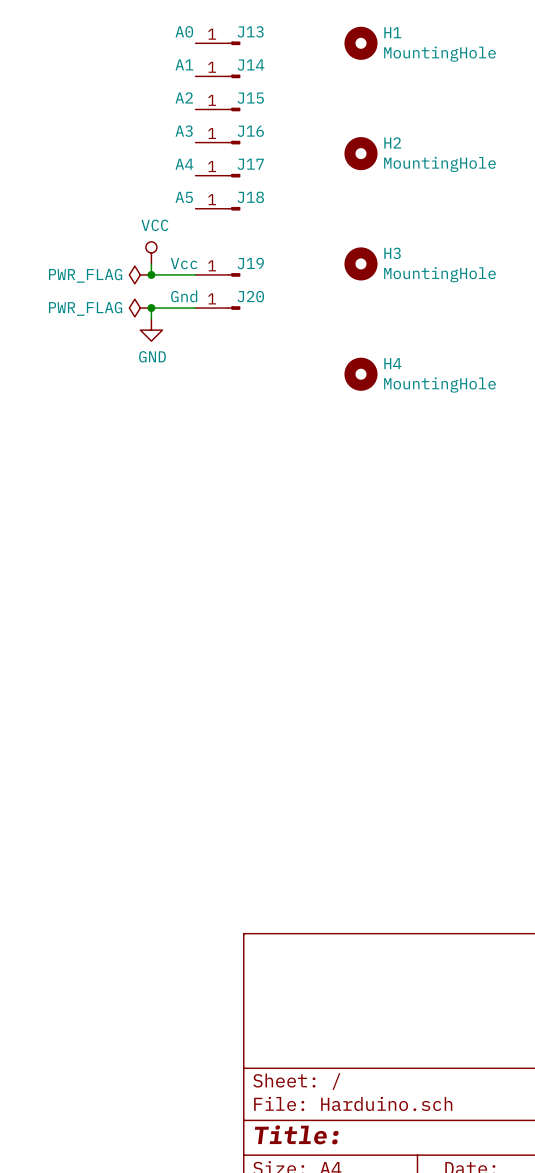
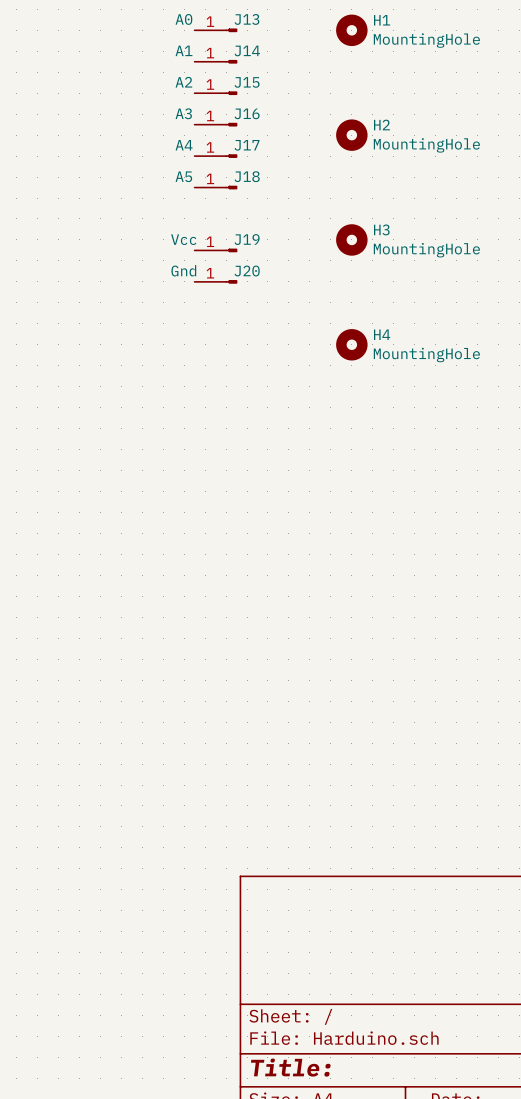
power symbol: VCC (151, 252) -> none
wire: (151, 263) (151, 274) (195, 274) -> none
power symbol: PWR_FLAG (140, 274) -> none
junction: (151, 274) -> none
power symbol: PWR_FLAG (140, 308) -> none
junction: (151, 308) -> none
wire: (195, 308) (151, 308) (151, 319) -> none
power symbol: GND (151, 330) -> none

